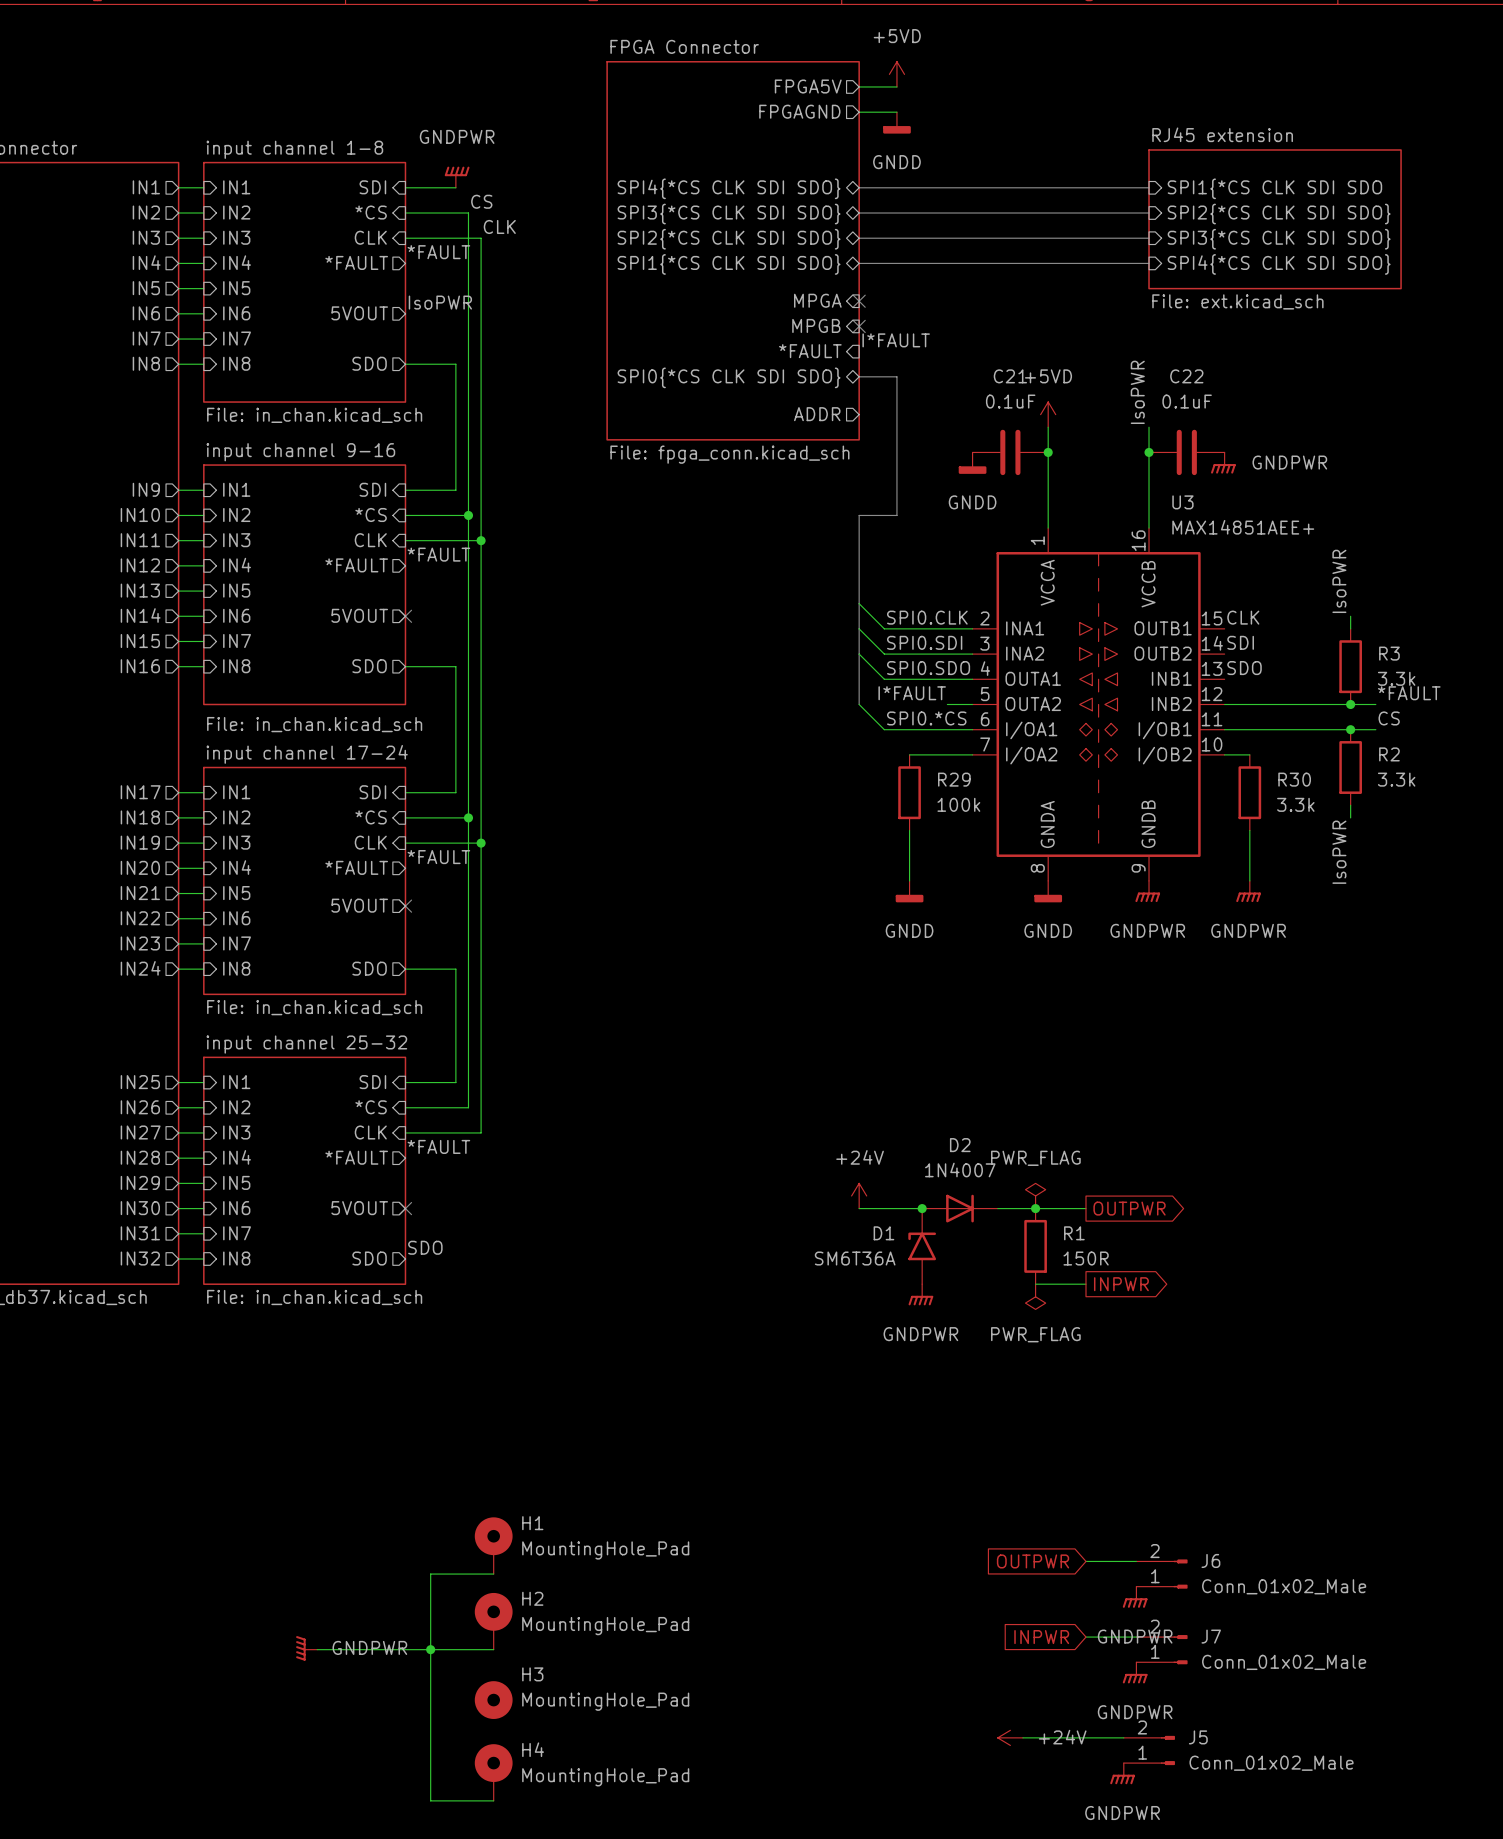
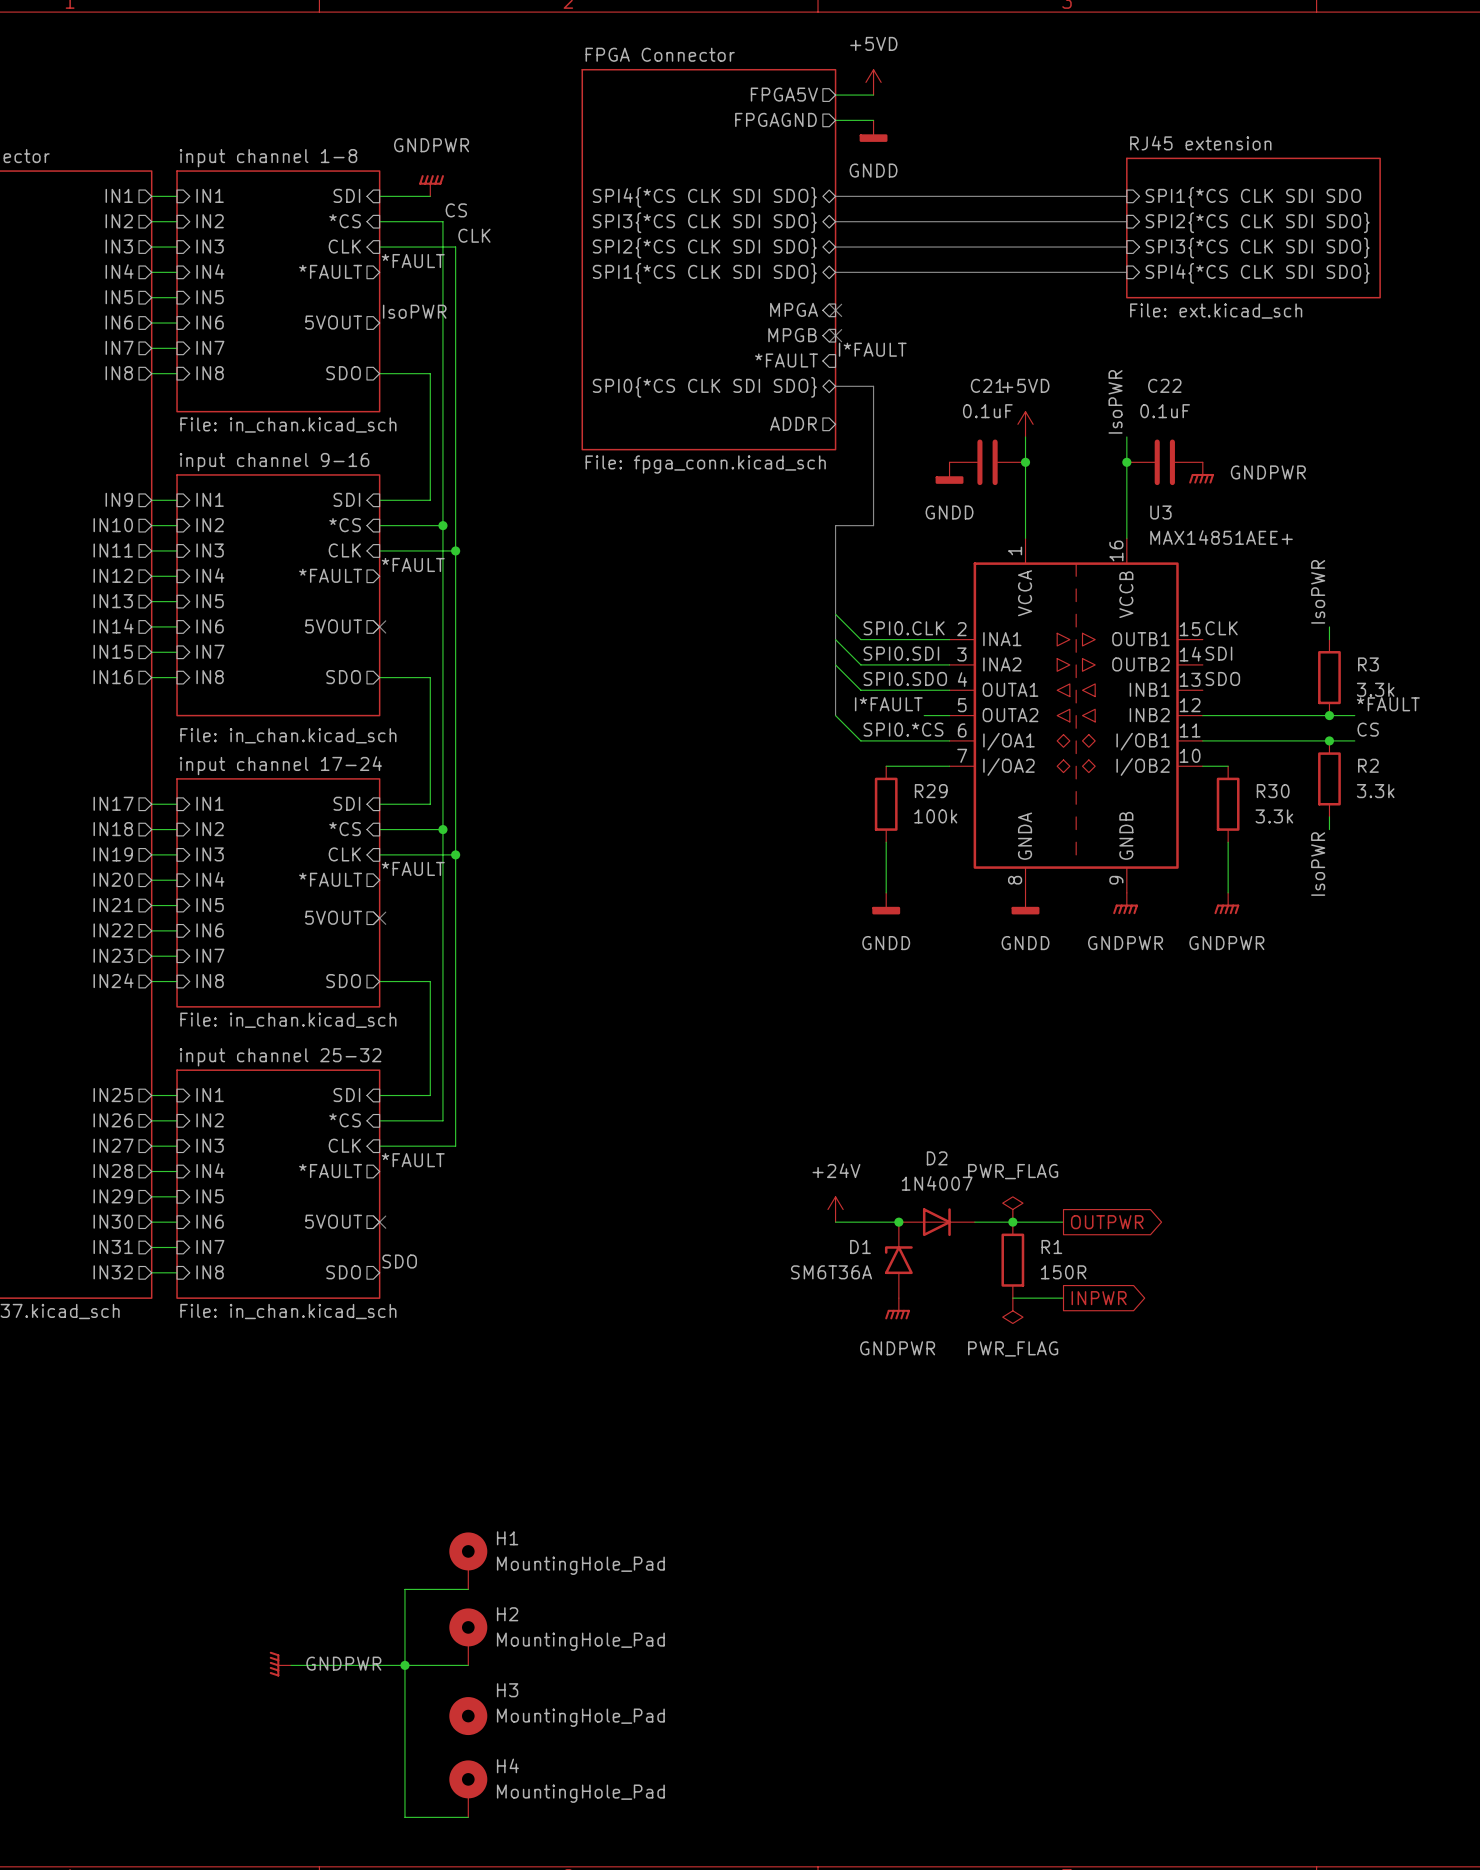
global label: OUTPWR (1033, 1561) -> none
wire: (1086, 1561) (1136, 1561) -> none
J6: Conn_01x02_Male (1161, 1574) -> none
power symbol: GNDPWR (1135, 1597) -> none
global label: INPWR (1041, 1637) -> none
wire: (1086, 1637) (1136, 1637) -> none
J7: Conn_01x02_Male (1161, 1649) -> none
power symbol: GNDPWR (1135, 1672) -> none
power symbol: +24V (1010, 1737) -> none
wire: (1022, 1737) (1123, 1737) -> none
J5: Conn_01x02_Male (1149, 1750) -> none
power symbol: GNDPWR (1122, 1773) -> none

